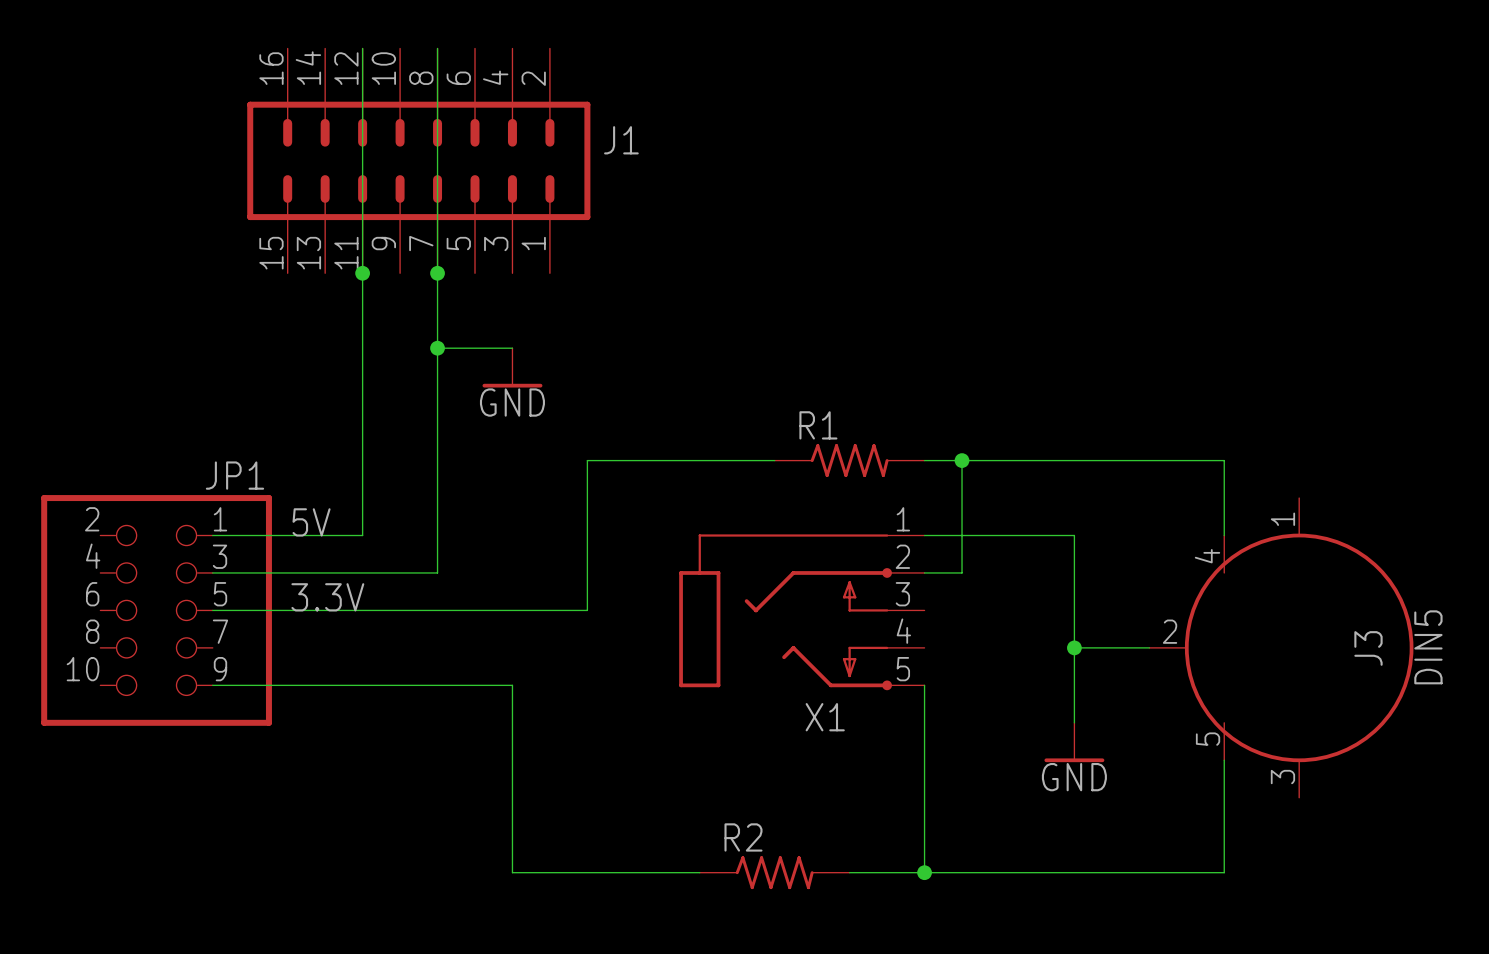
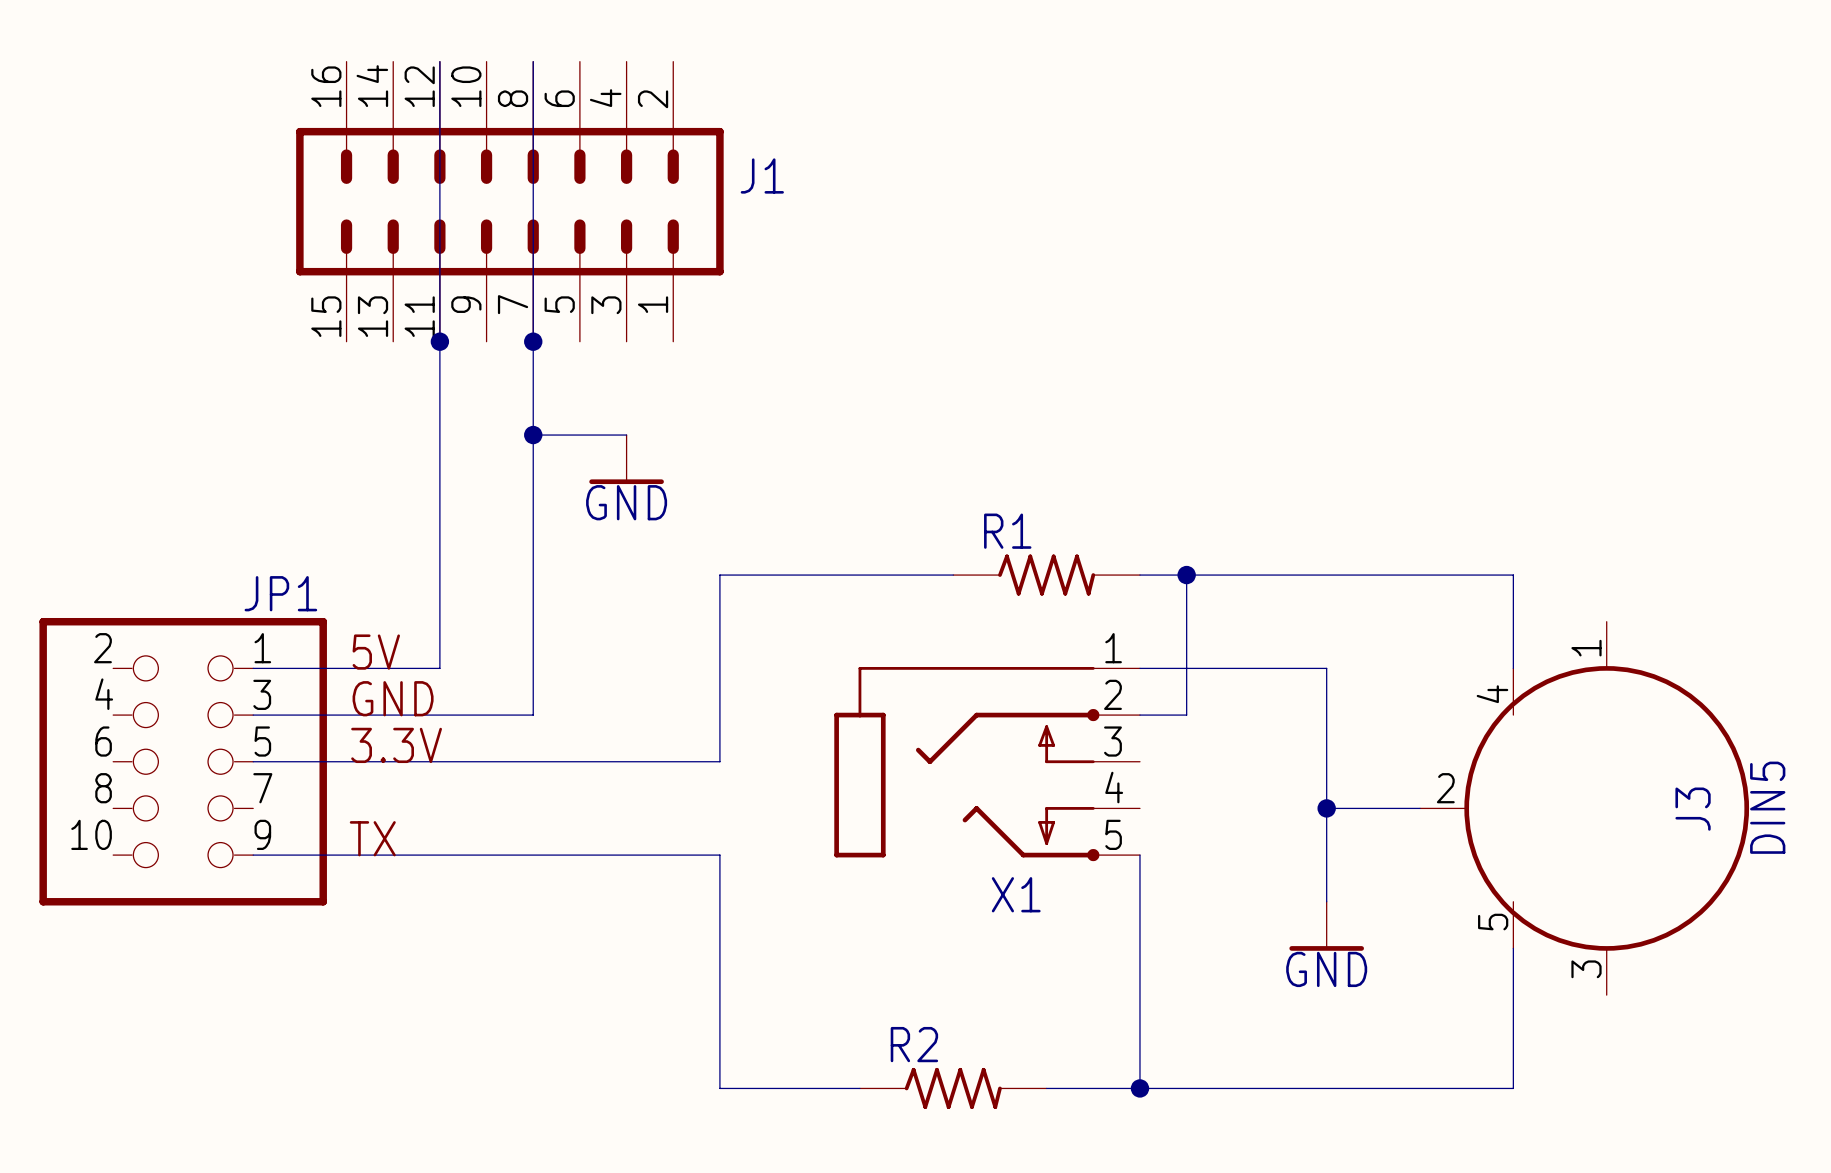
label: none -> GND (393, 698)
label: none -> TX (372, 838)
wire: (512, 685) (512, 872) (587, 872) -> (626, 855) (719, 855) (719, 1088)

